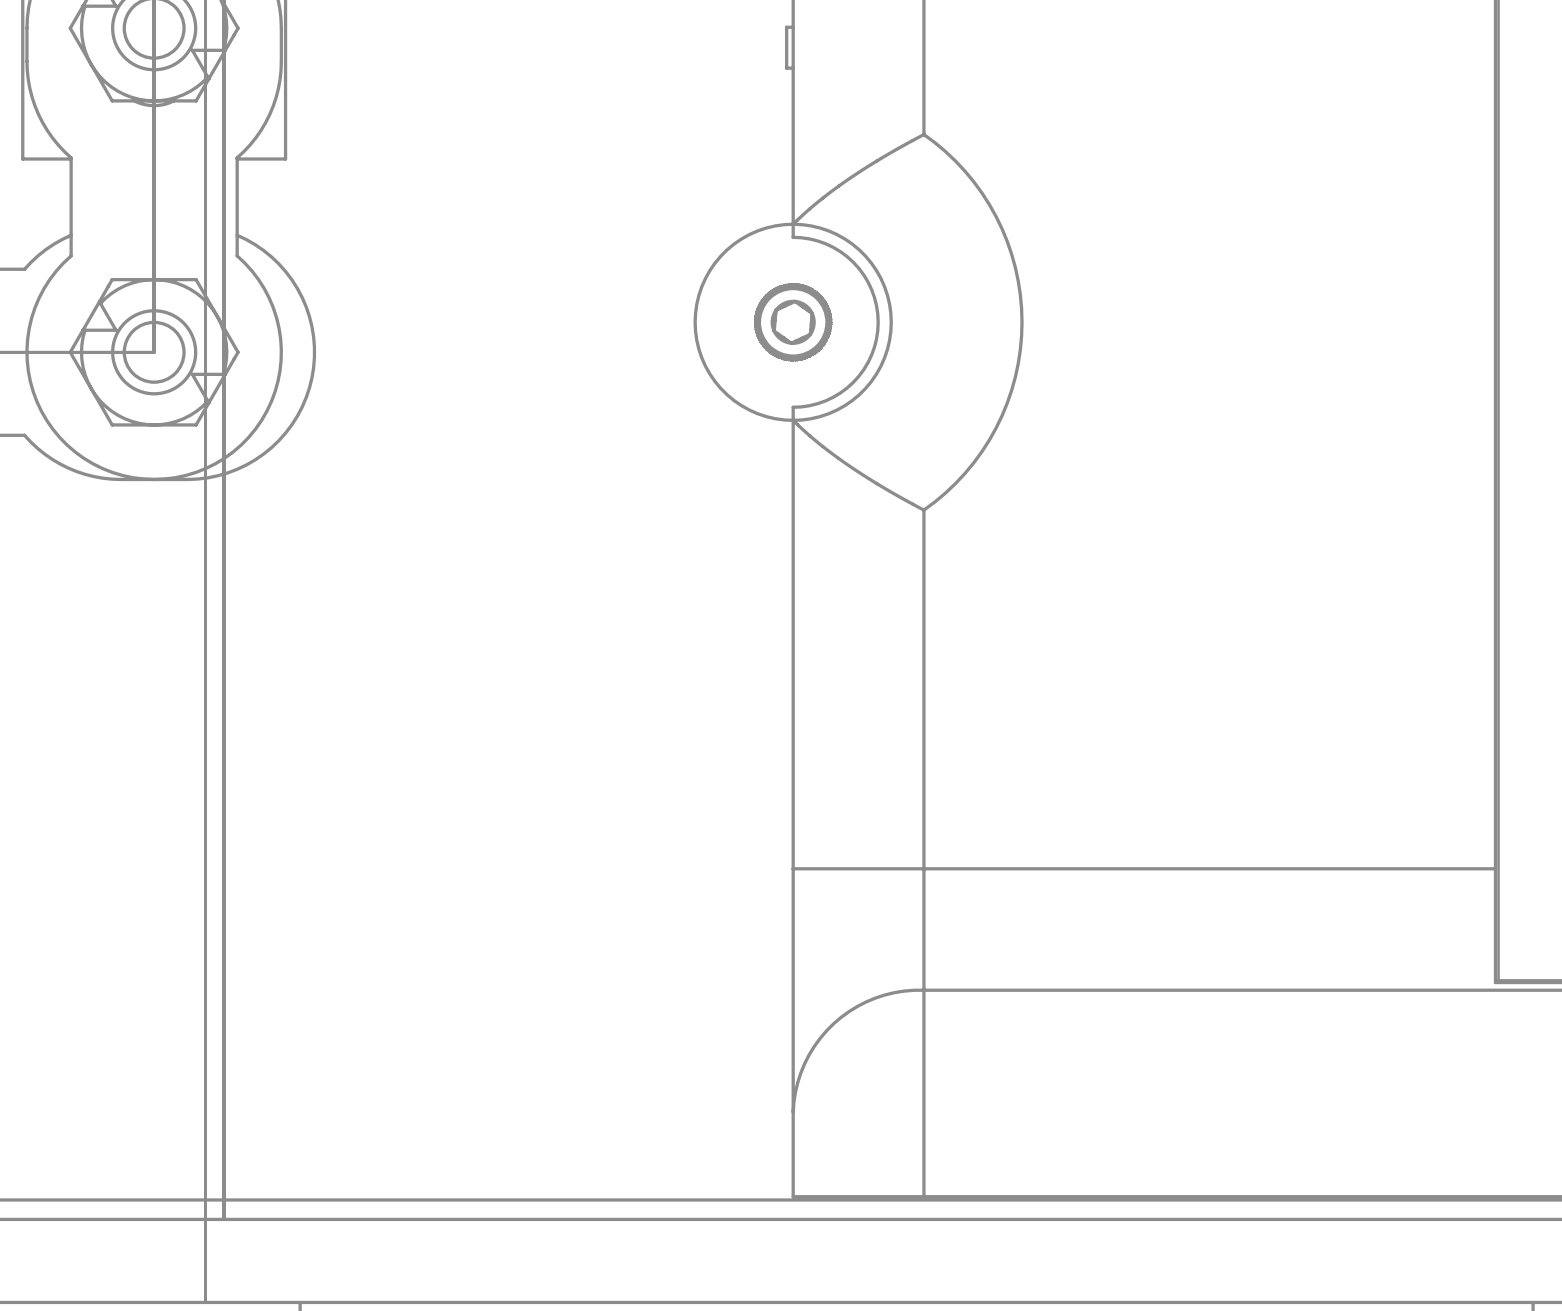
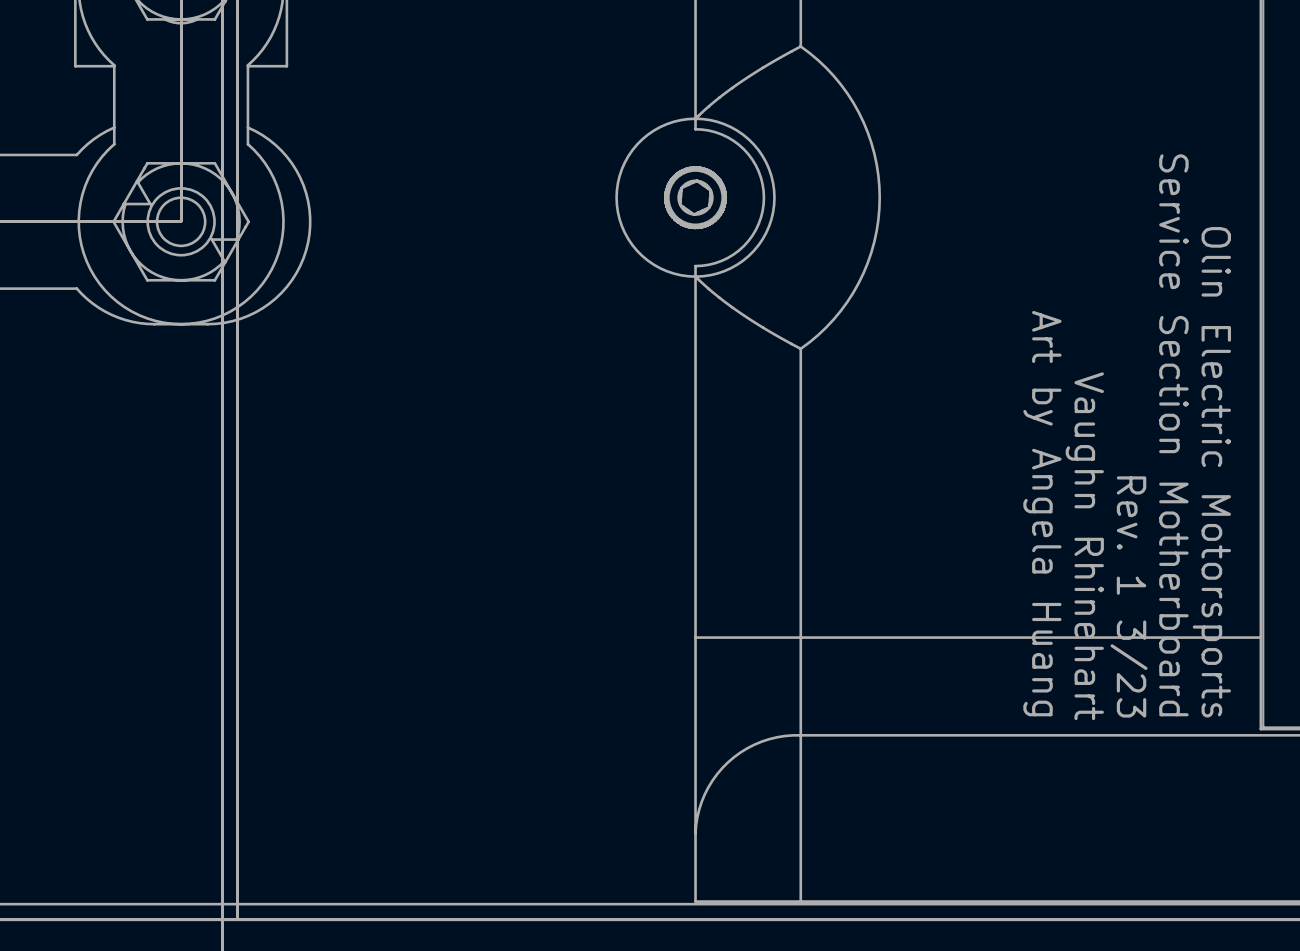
text: none -> Service Section Motherboard (1173, 435)
text: none -> Olin Electric Motorsports (1211, 472)
text: none -> Art by Angela Huang (1042, 513)
text: none -> Vaughn Rhinehart (1084, 546)
text: none -> Rev. 1 3/23 (1129, 596)

